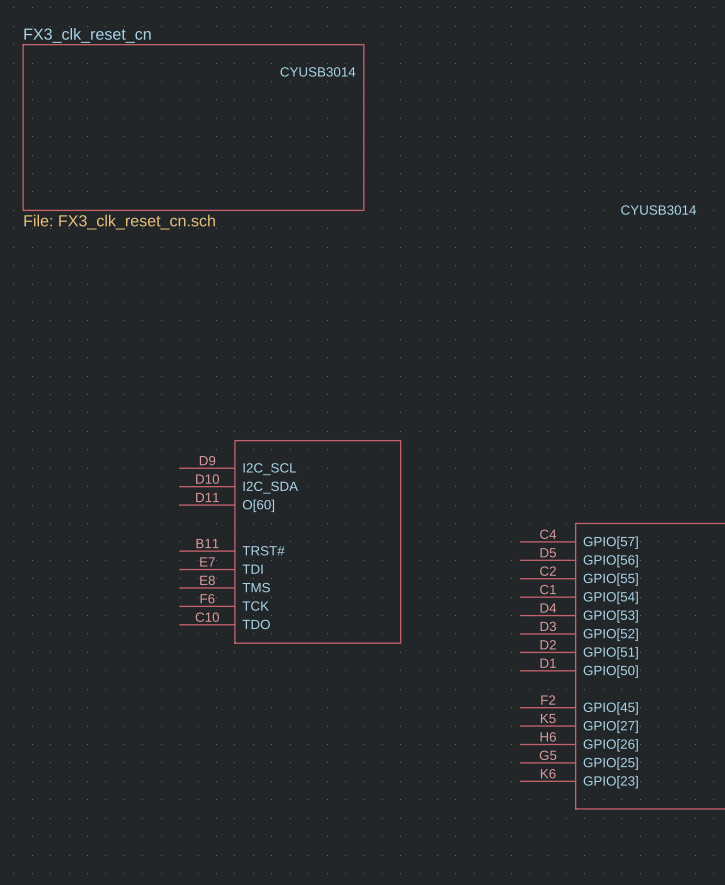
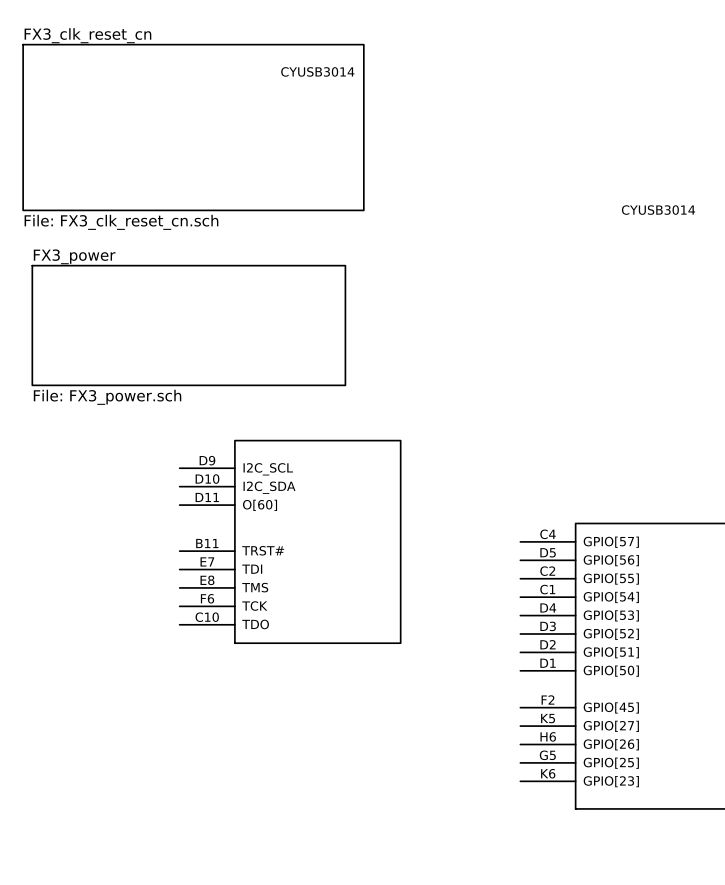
sheet FX3_power: none -> File: FX3_power.sch (188, 325)

